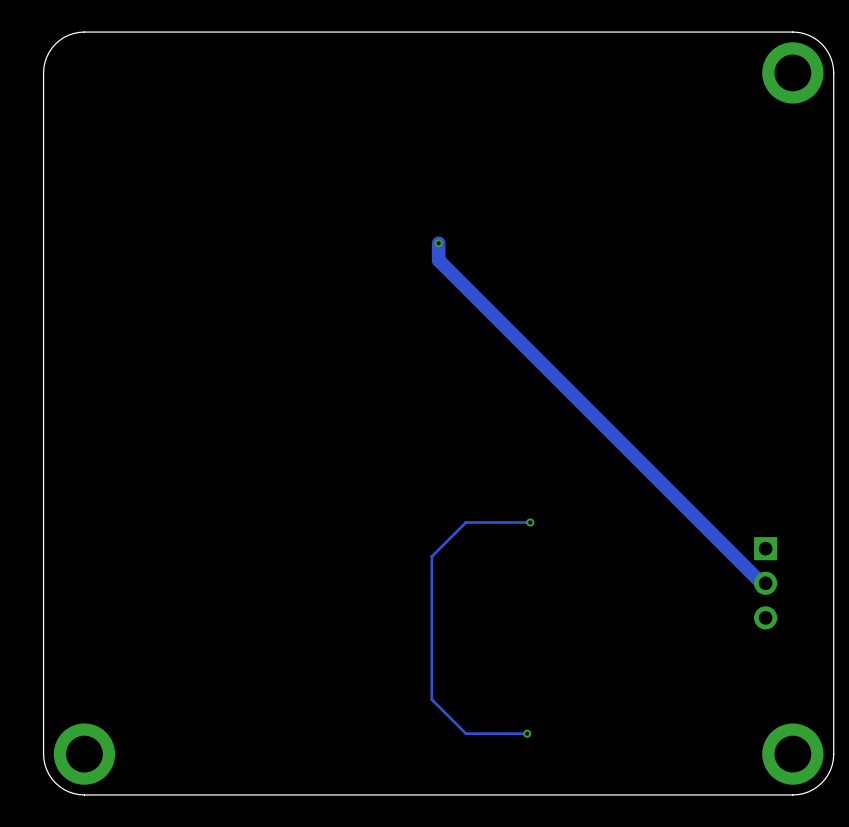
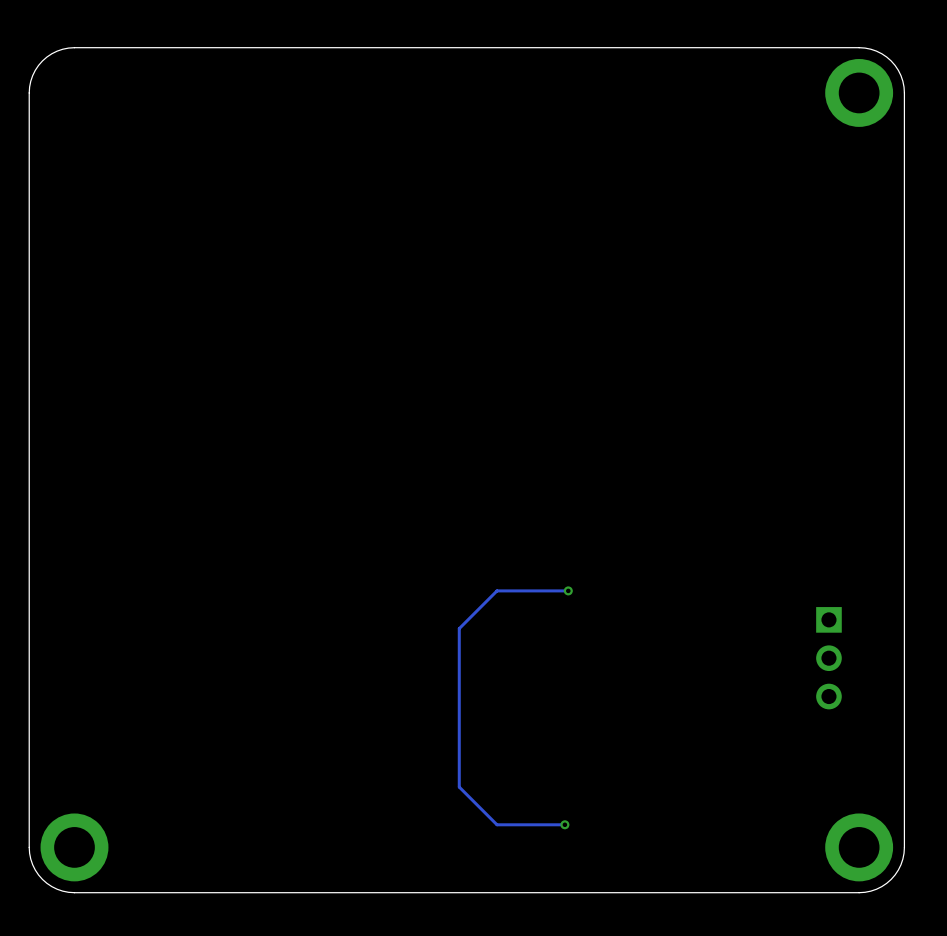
track: (438, 243) (438, 260) (761, 583) (765, 583) -> none
via: (438, 243) -> none

